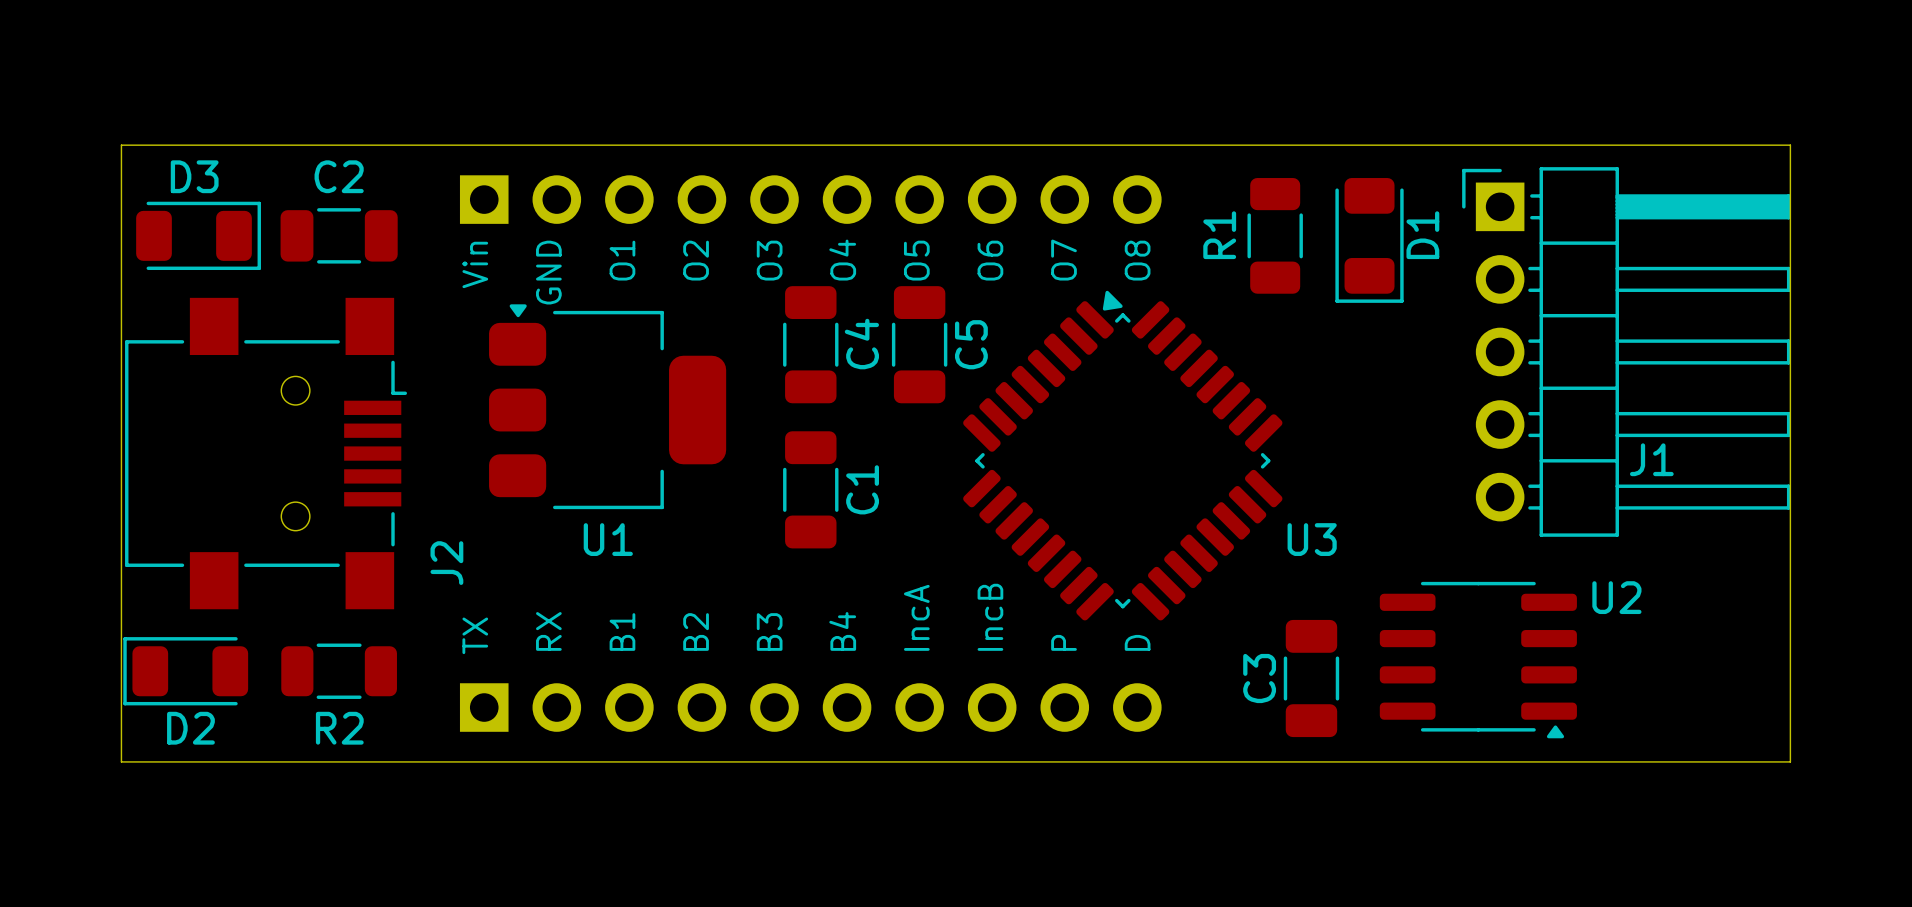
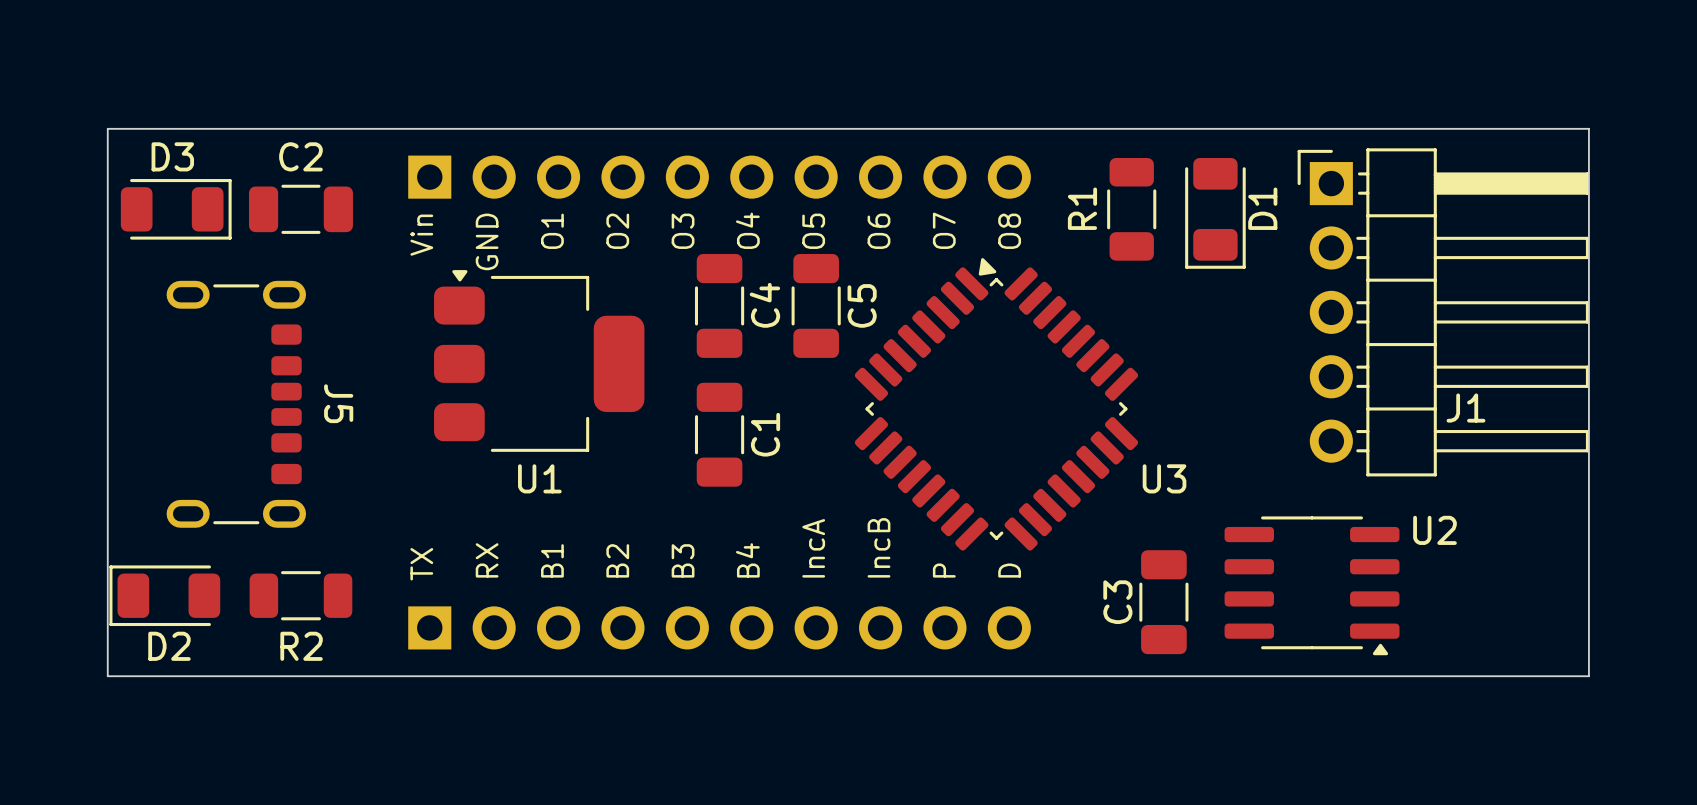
J2: (266, 453) -> none
J5: none -> (236, 404)

